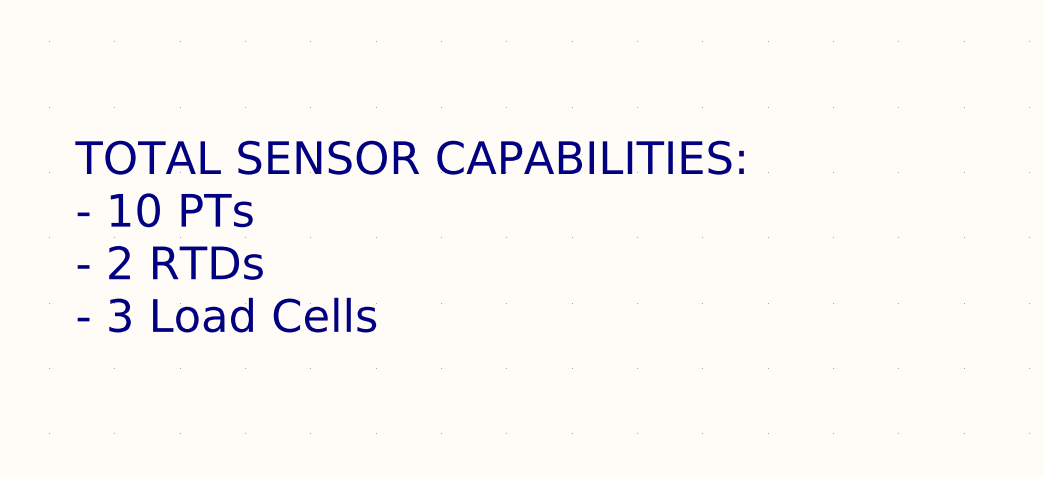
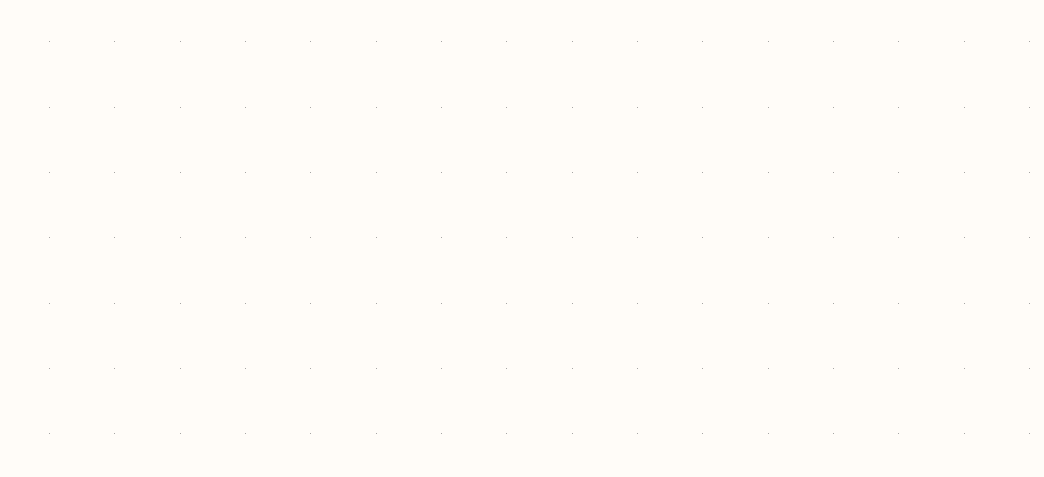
text: TOTAL SENSOR CAPABILITIES: (409, 157) -> none
text: - 10 PTs (165, 210) -> none
text: - 2 RTDs (170, 262) -> none
text: - 3 Load Cells (226, 315) -> none

